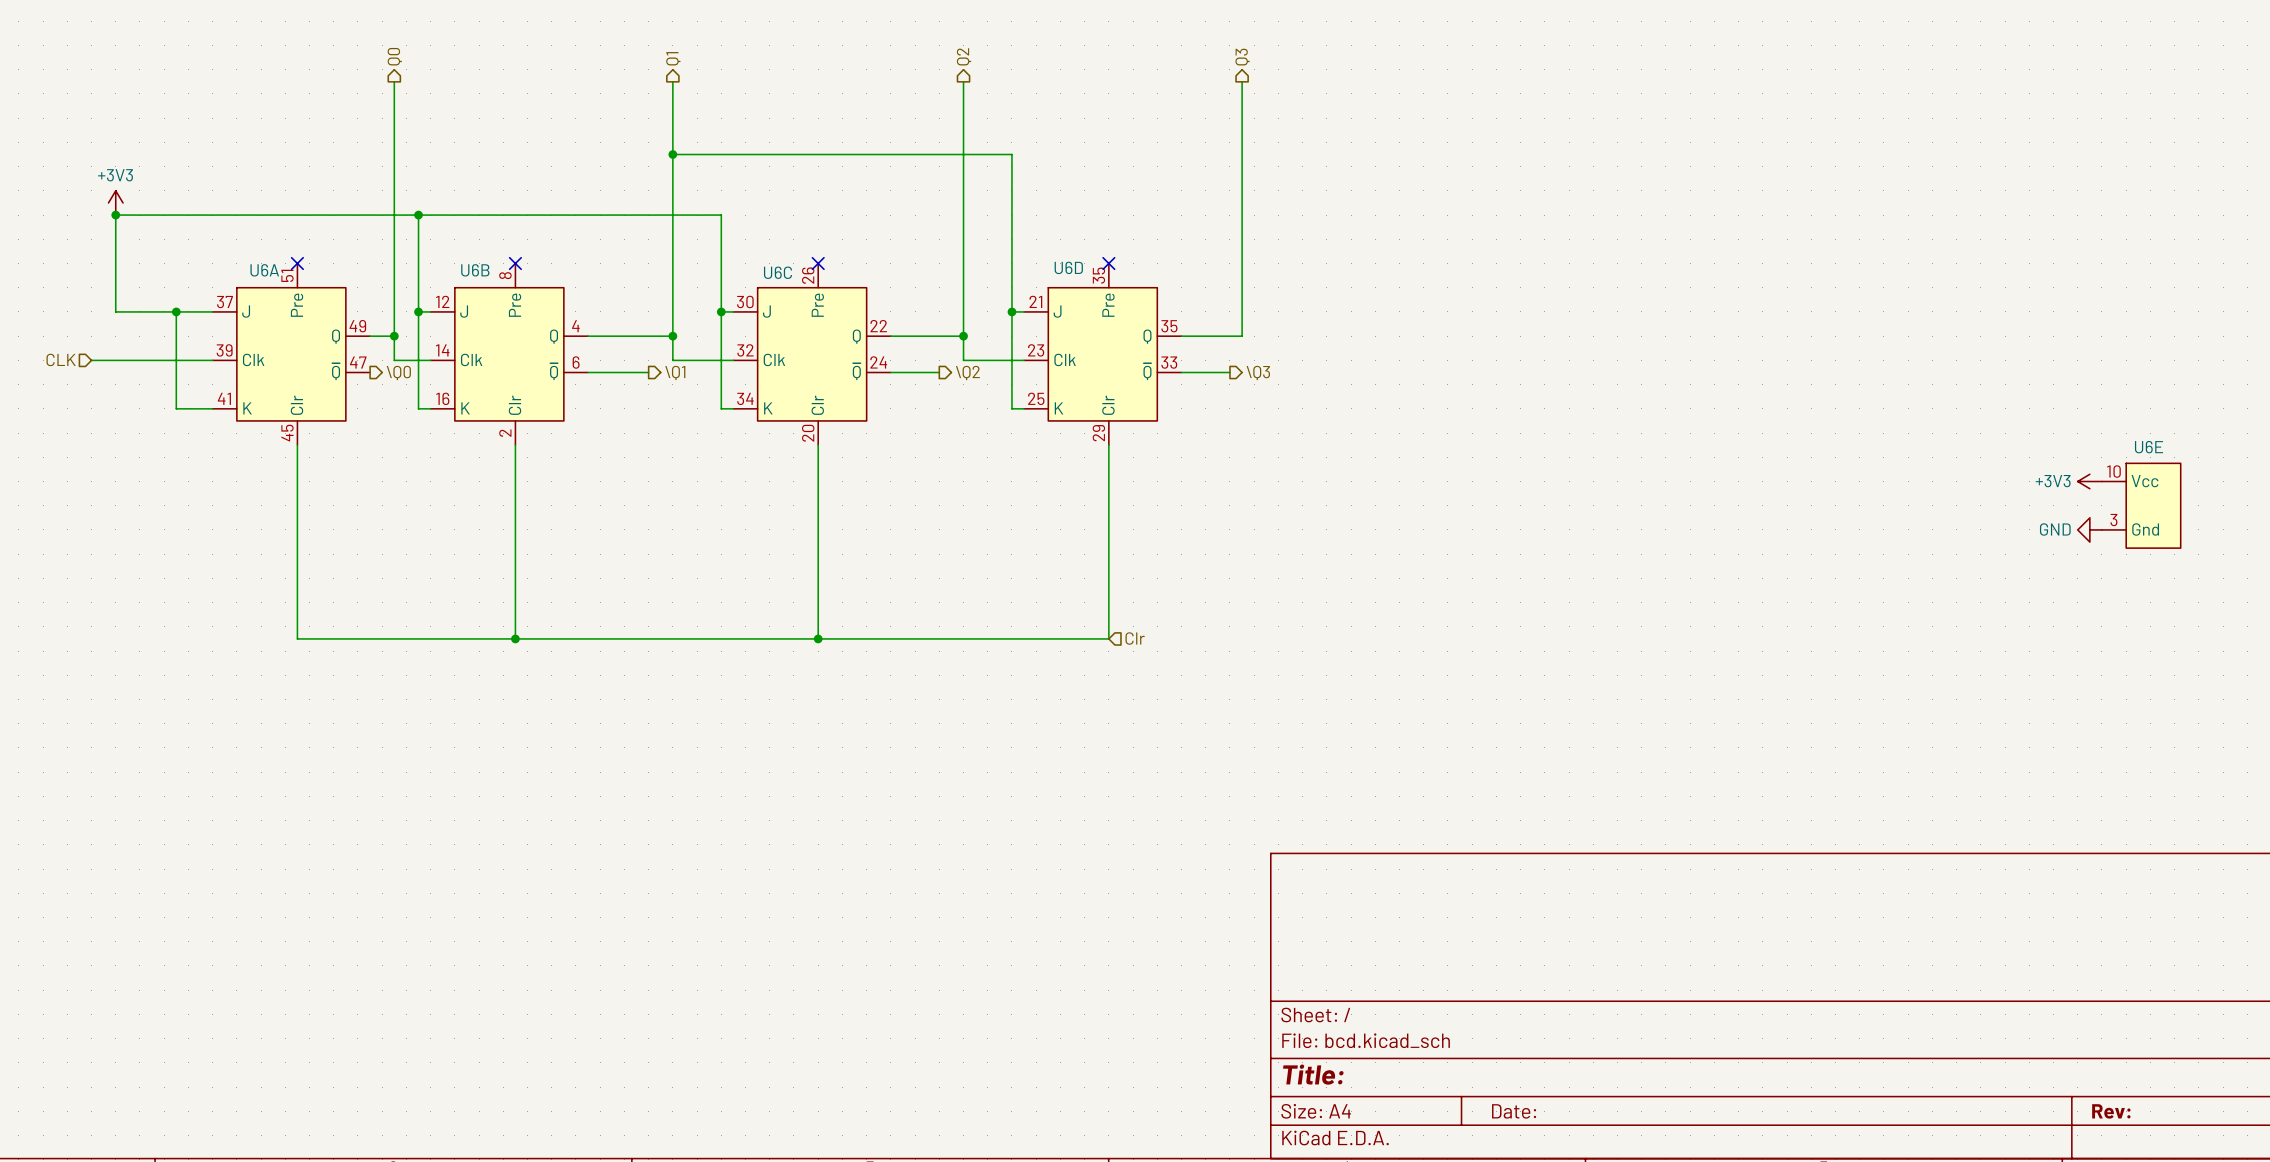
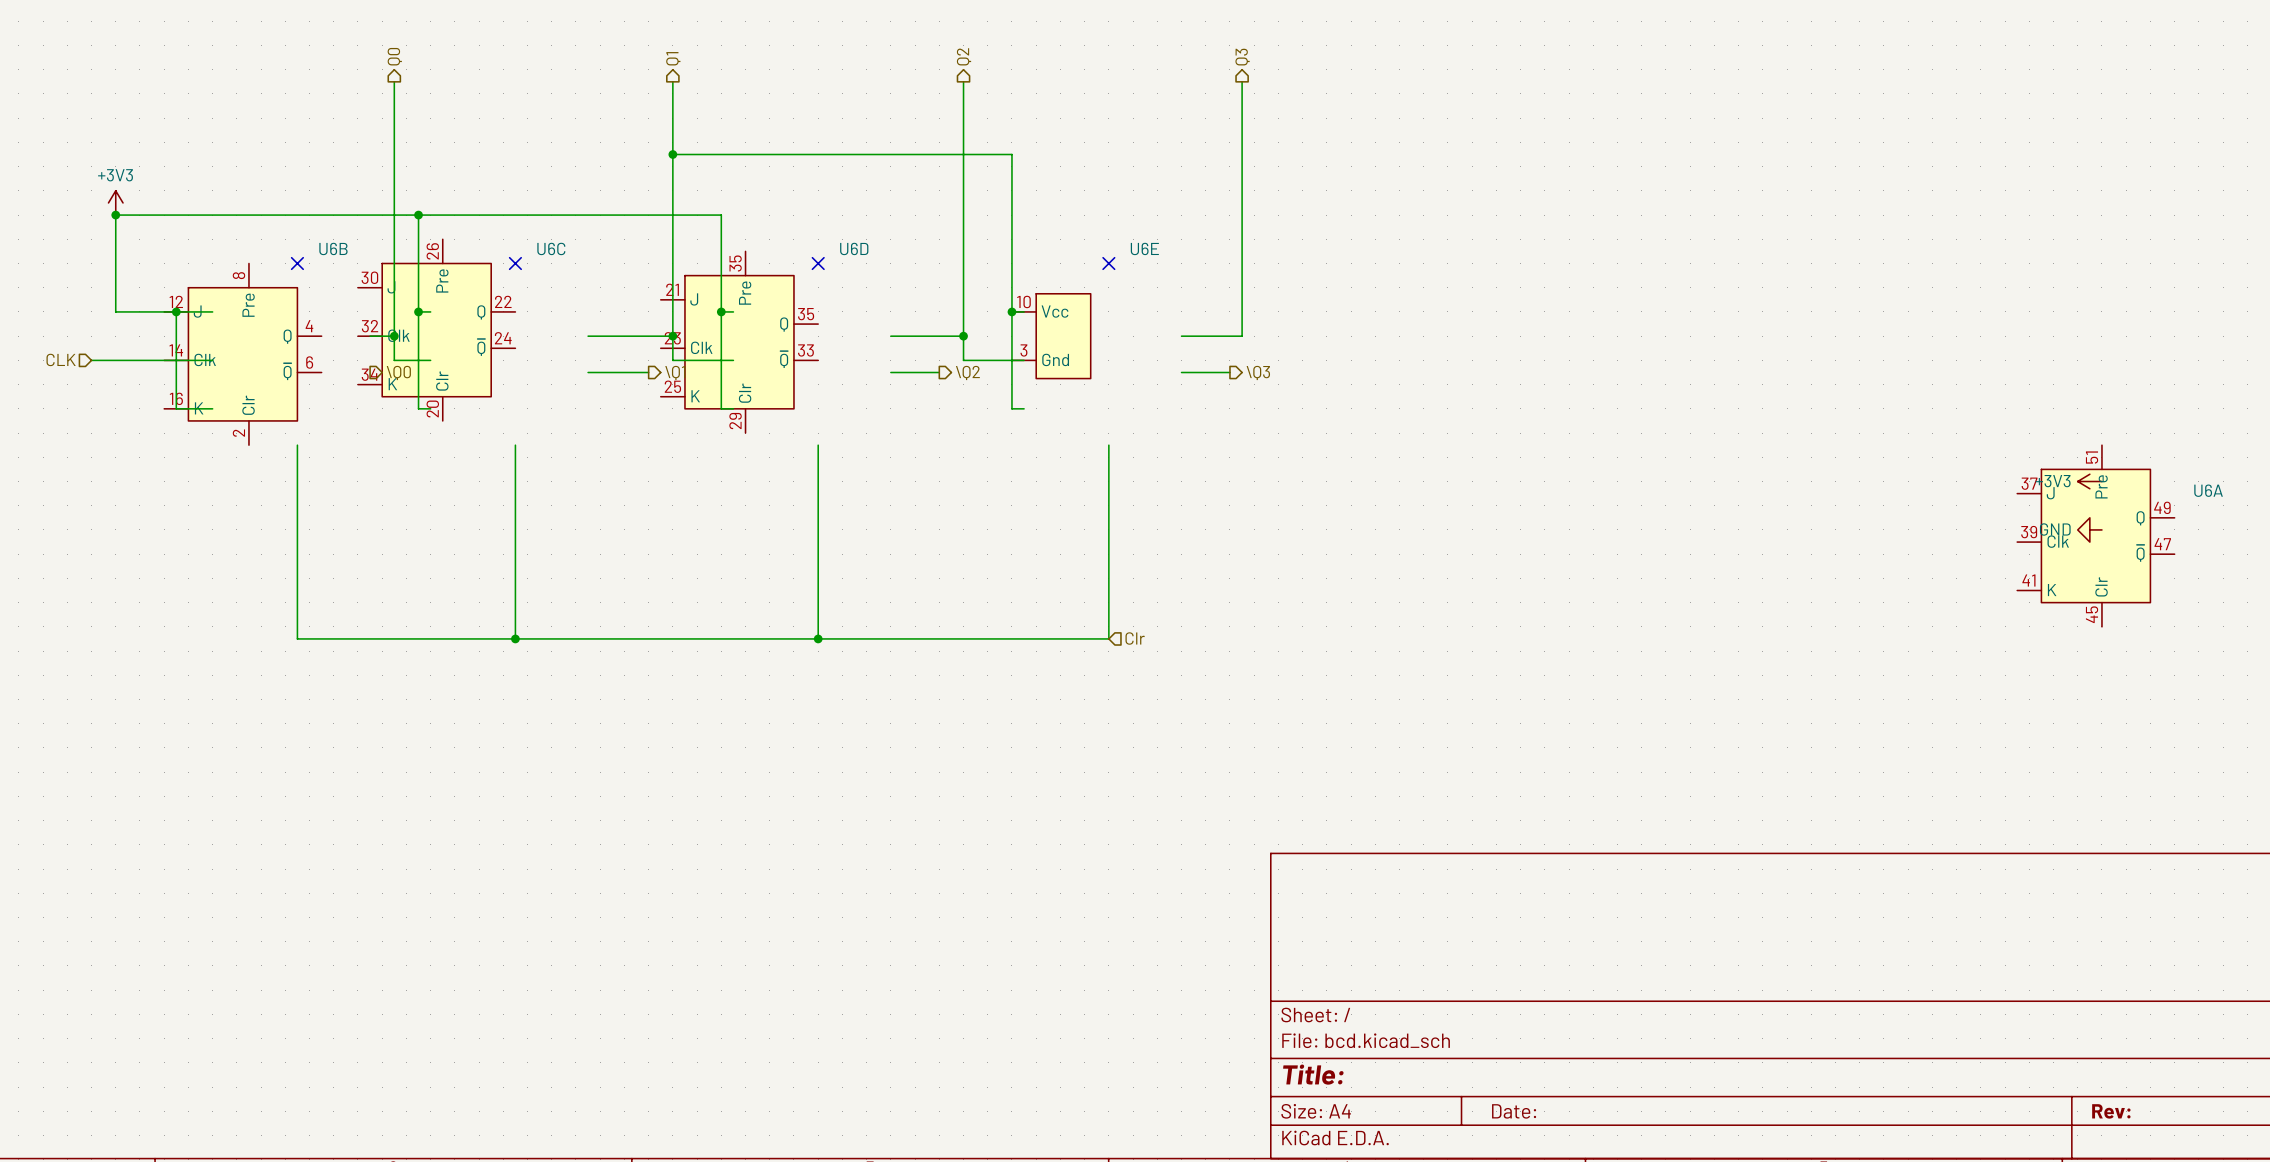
U6D name position: U6D (1068, 267) -> U6D (854, 248)
U6A name position: U6A (264, 270) -> U6A (2208, 490)
U6B name position: U6B (475, 270) -> U6B (333, 248)
U6C name position: U6C (777, 272) -> U6C (551, 248)
U6A position: (291, 354) -> (2095, 536)
U6B position: (509, 354) -> (242, 354)
U6C position: (812, 354) -> (436, 330)
U6D position: (1102, 354) -> (739, 342)
U6E name position: U6E (2149, 447) -> U6E (1144, 248)
U6E position: (2141, 505) -> (1051, 336)

